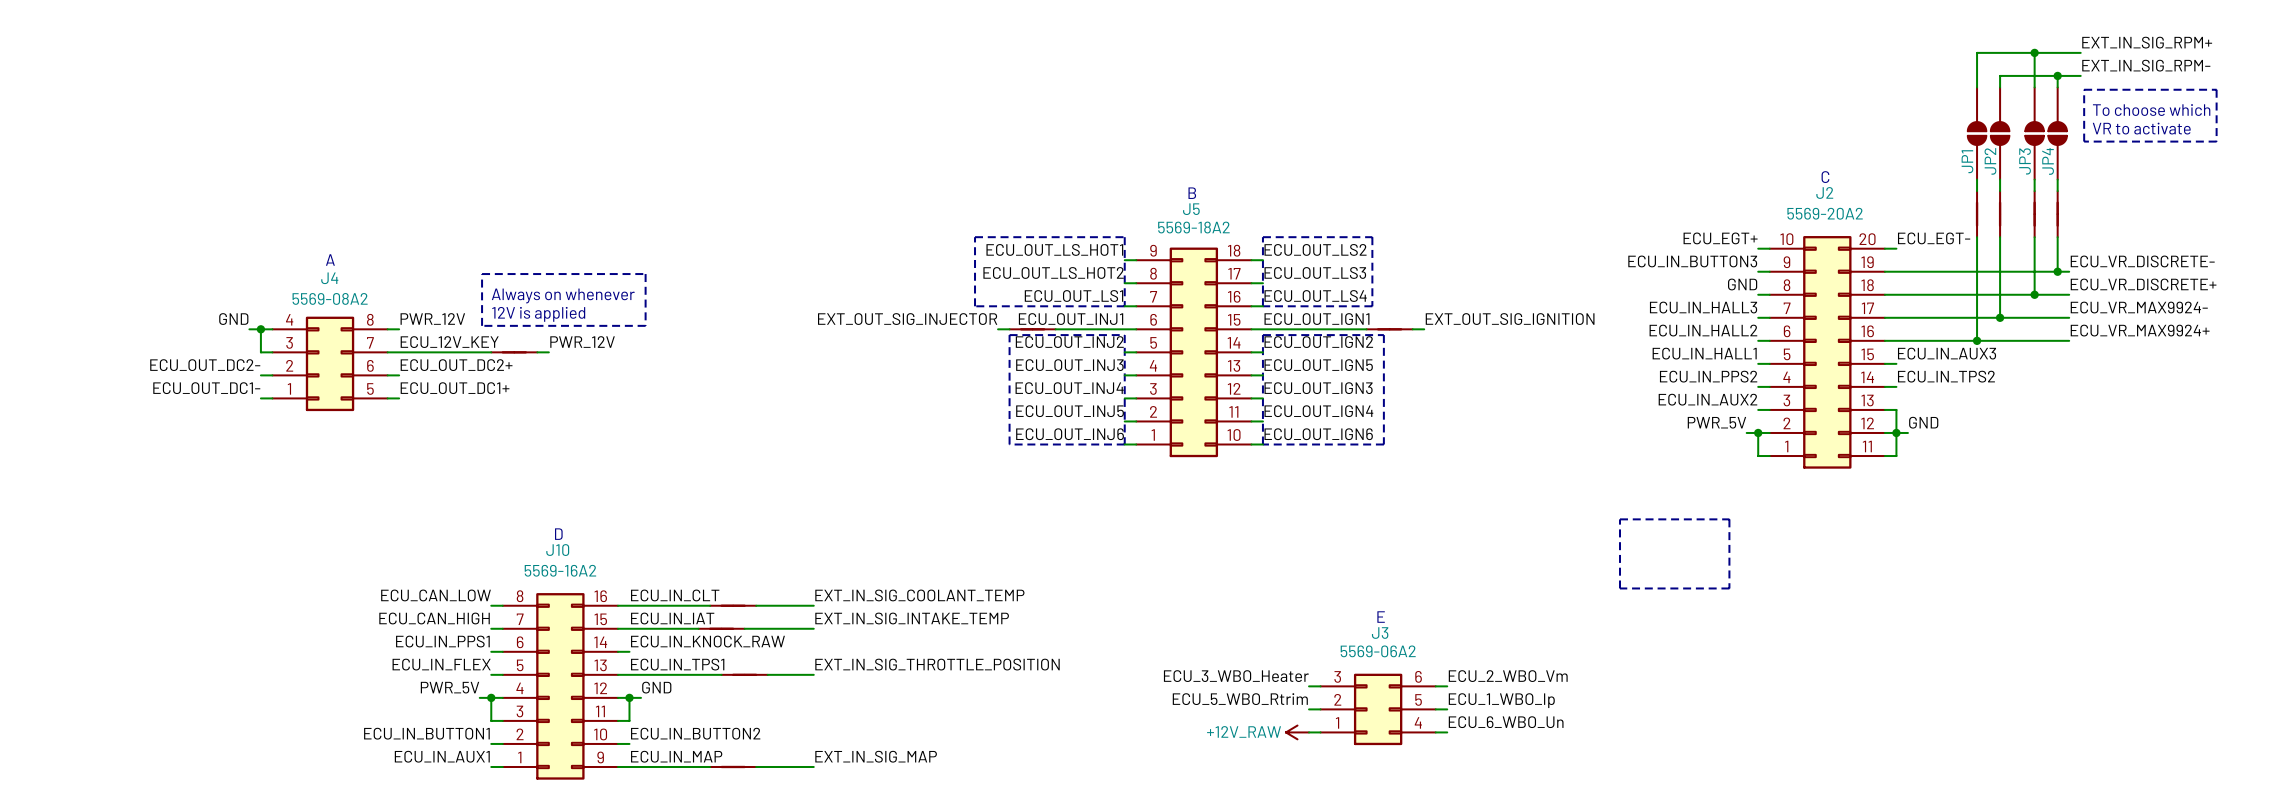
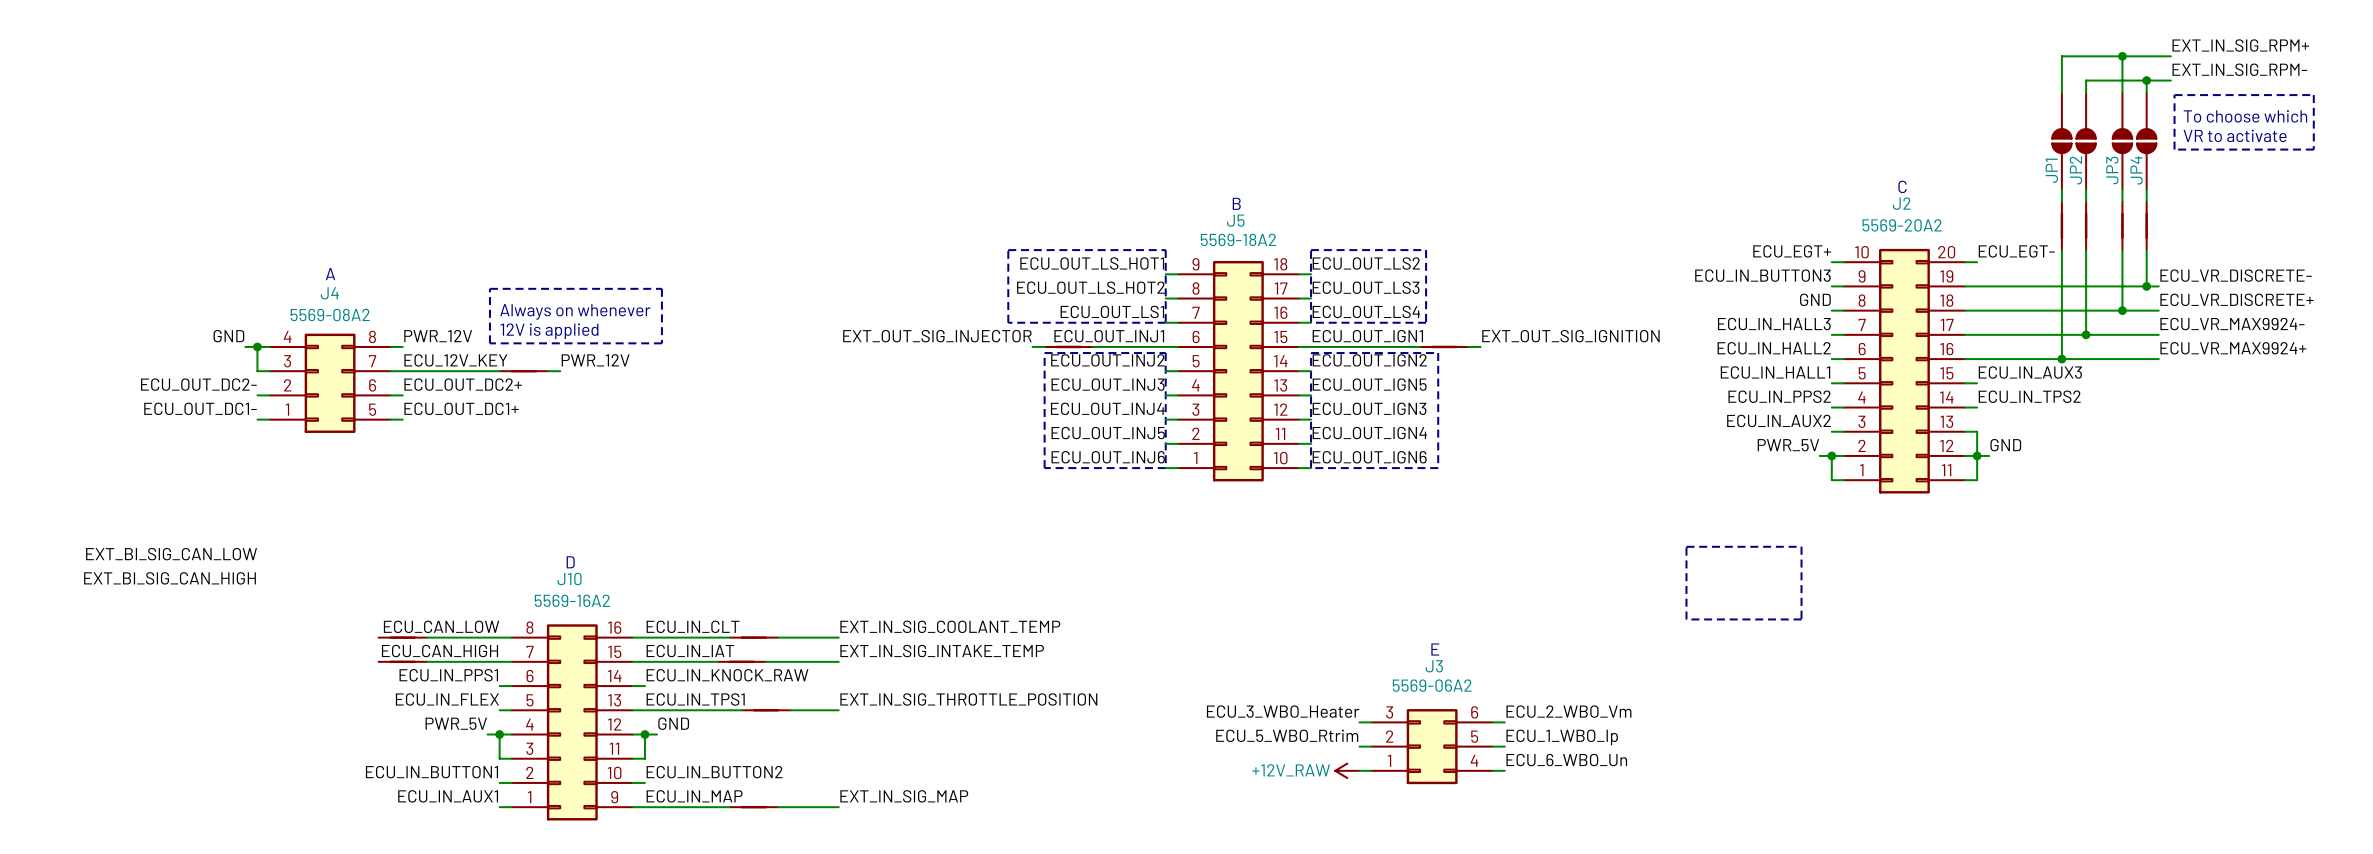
label: none -> EXT_BI_SIG_CAN_LOW (171, 554)
label: none -> EXT_BI_SIG_CAN_HIGH (170, 578)
part: none -> (402, 637)
wire: none -> (426, 637) (499, 637)
part: none -> (402, 661)
wire: none -> (426, 661) (499, 661)

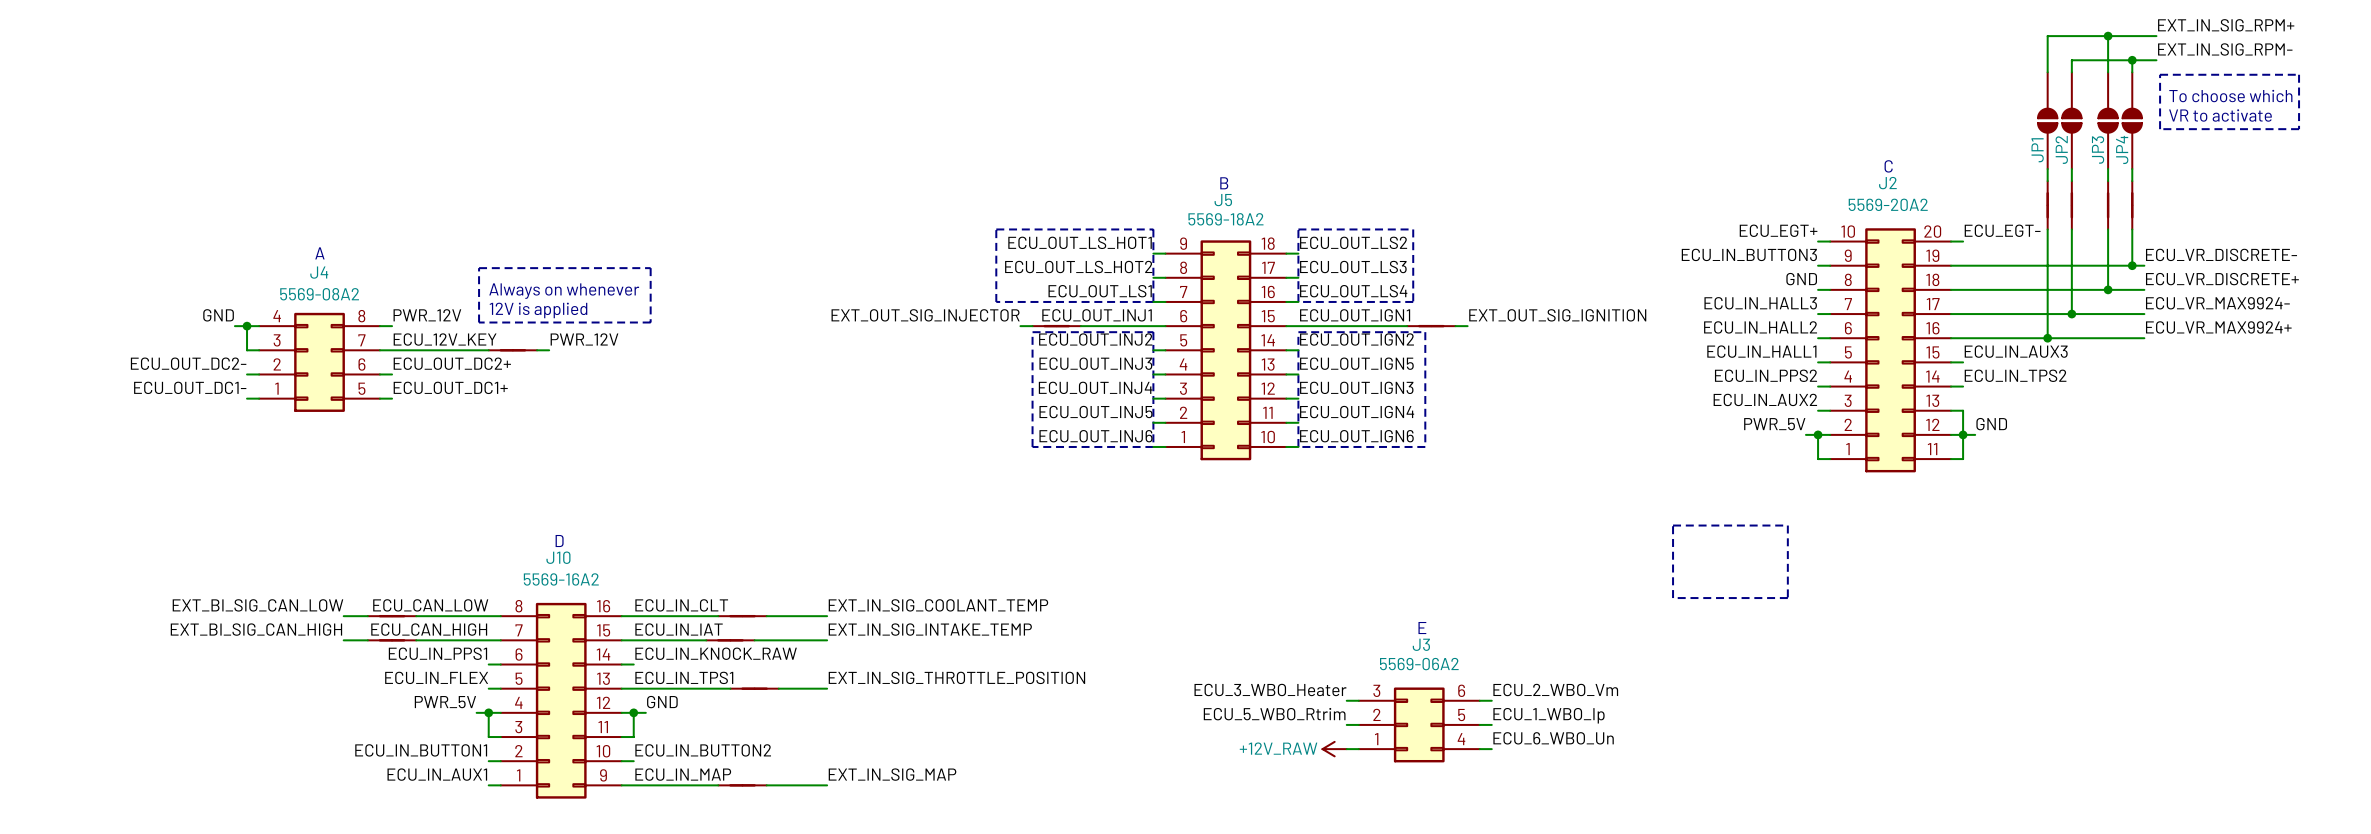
label position: EXT_BI_SIG_CAN_LOW (171, 554) -> EXT_BI_SIG_CAN_LOW (257, 605)
label position: EXT_BI_SIG_CAN_HIGH (170, 578) -> EXT_BI_SIG_CAN_HIGH (256, 629)
wire: none -> (343, 616) (367, 616)
wire: none -> (343, 640) (367, 640)

